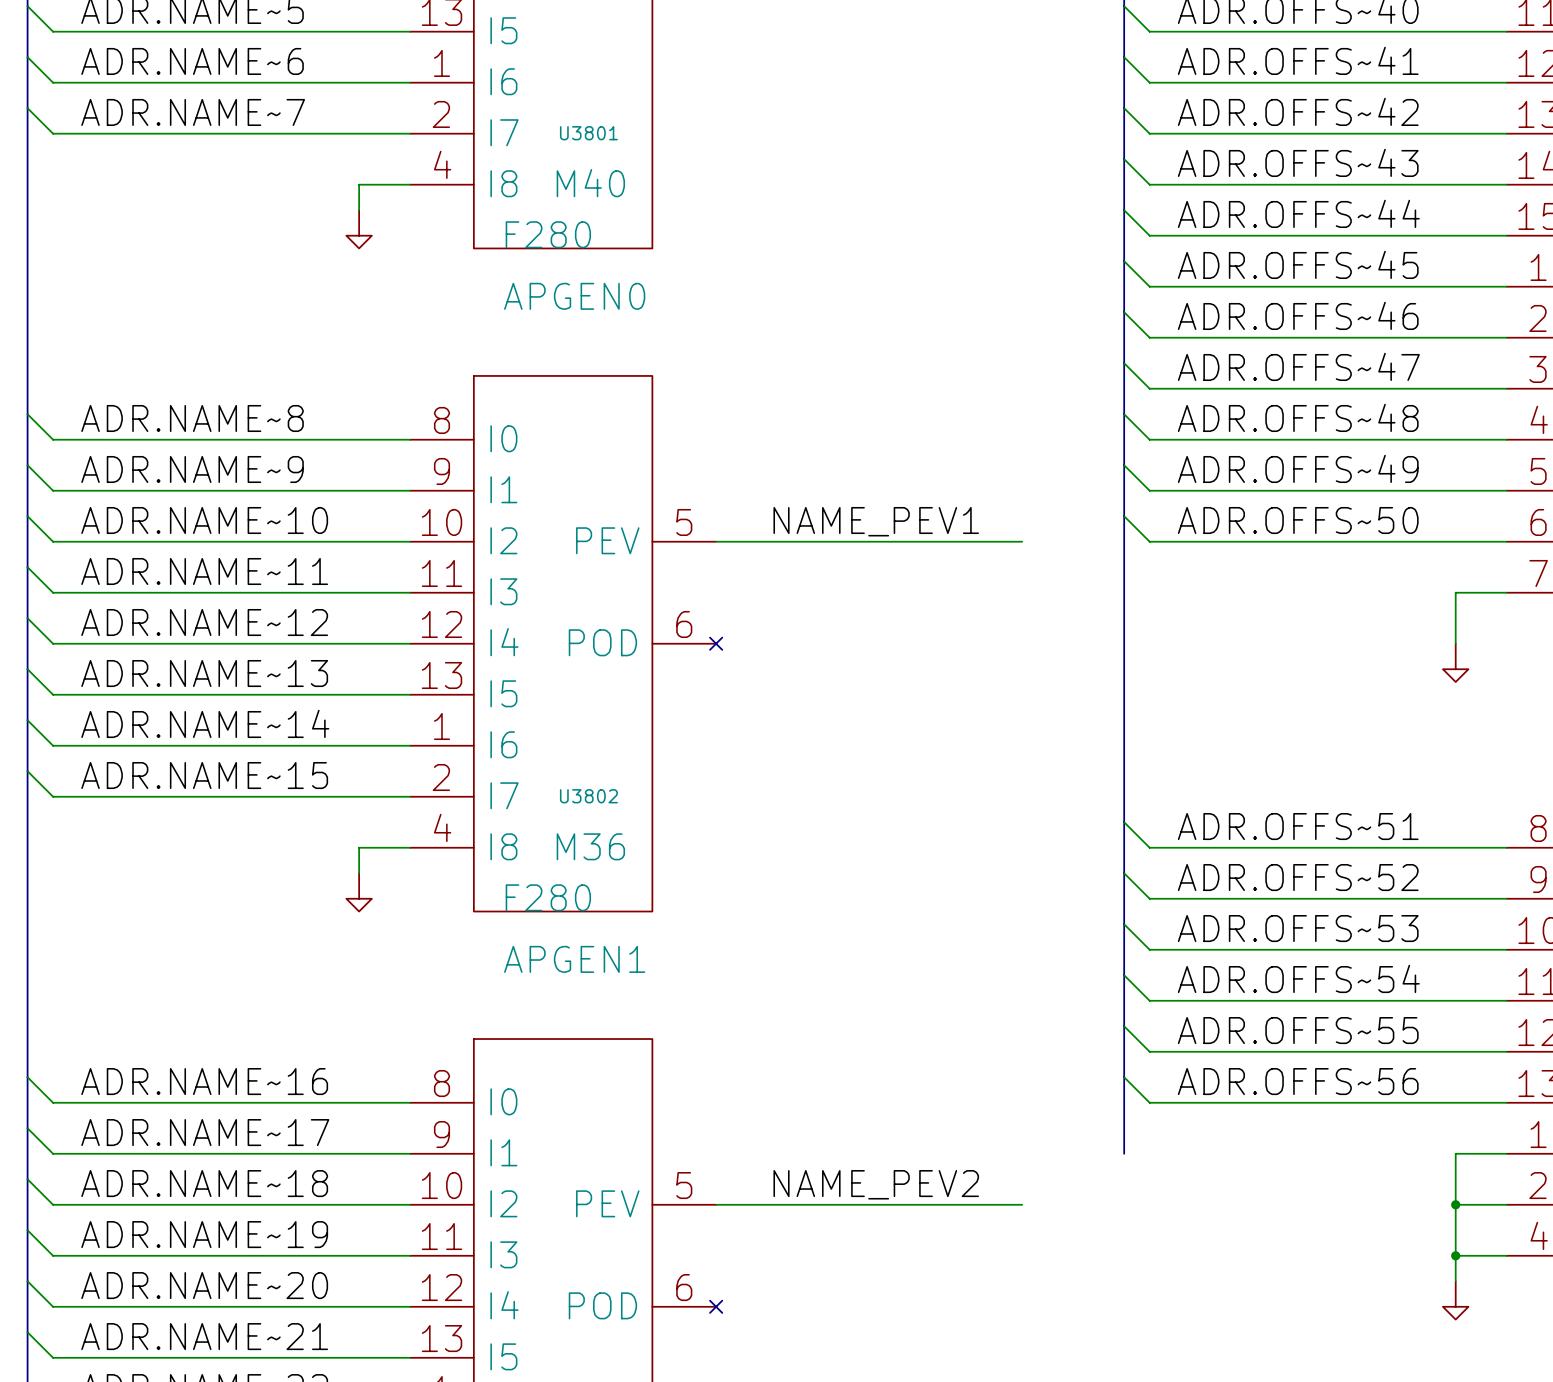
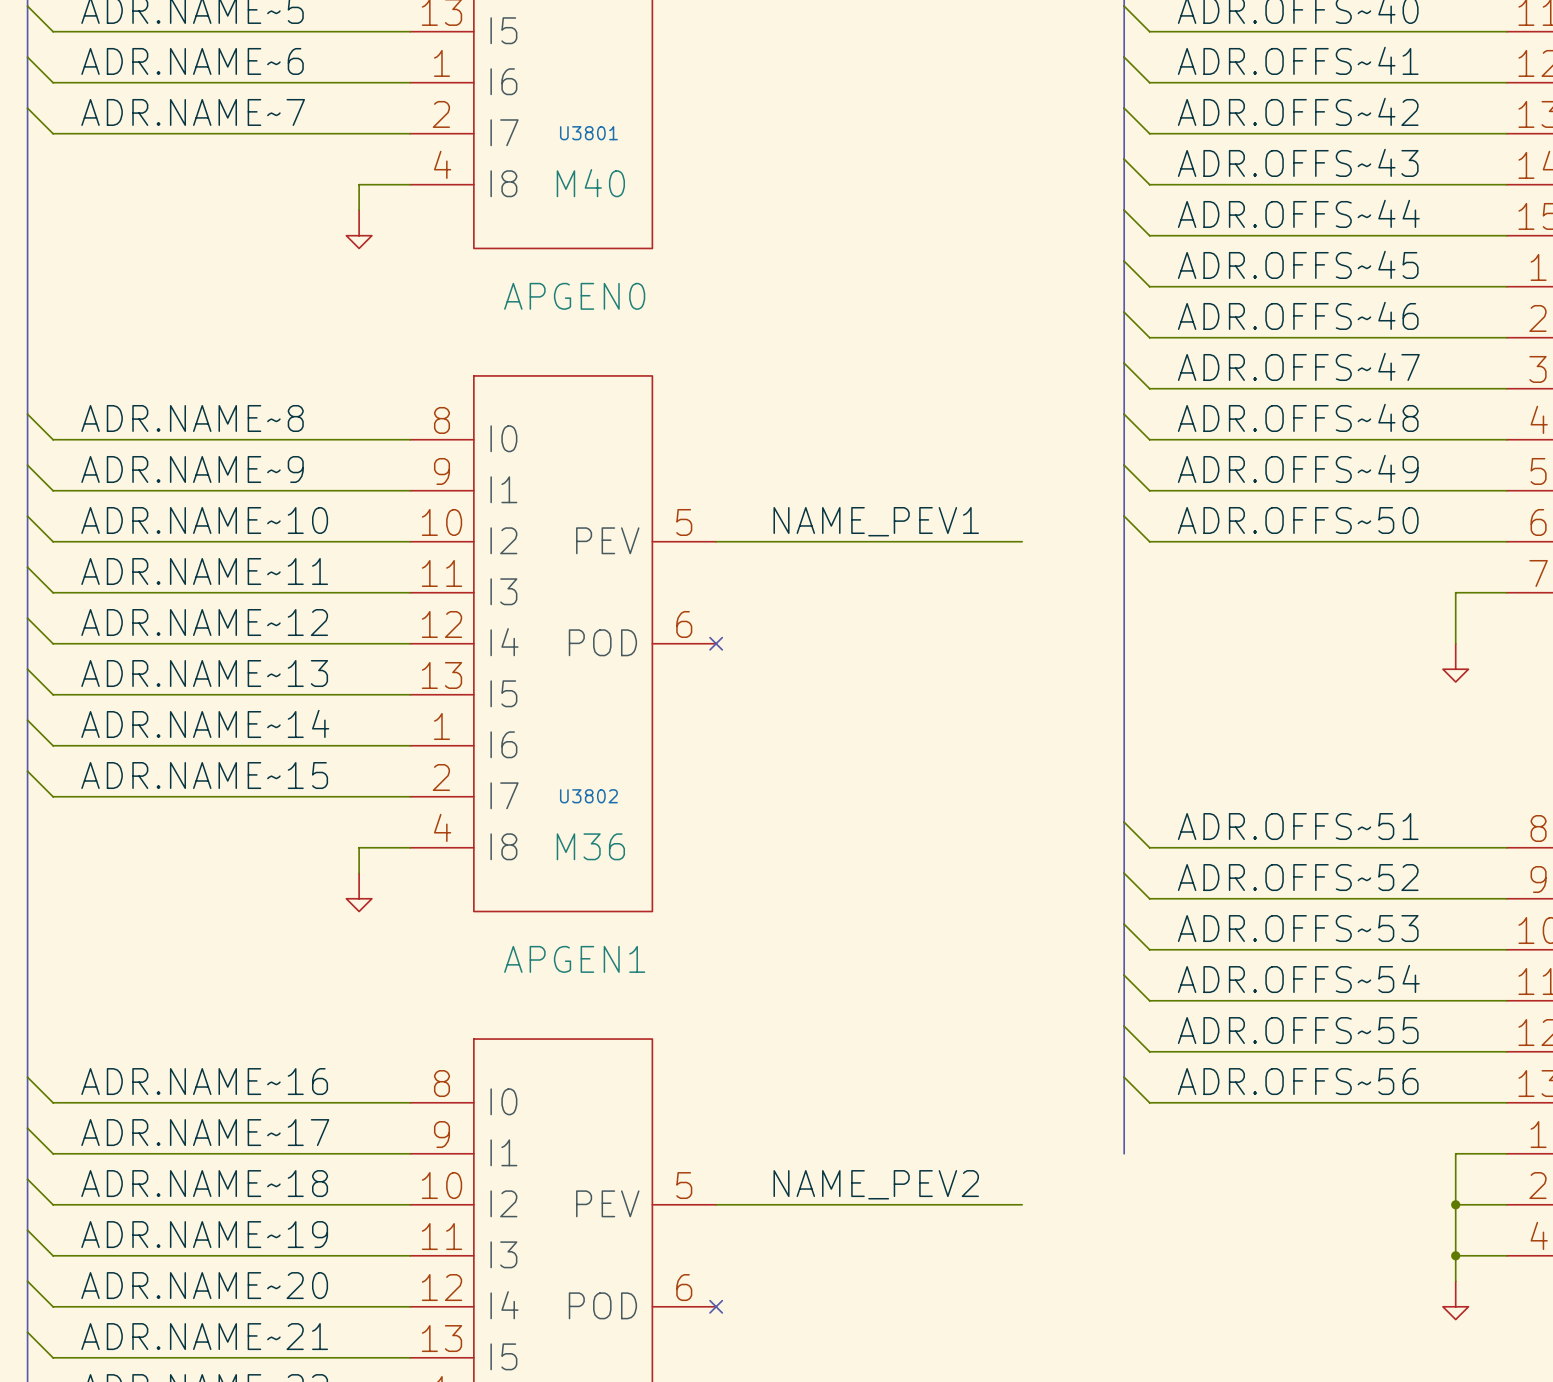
U3801 value: F280 (548, 234) -> none
U3802 value: F280 (548, 897) -> none

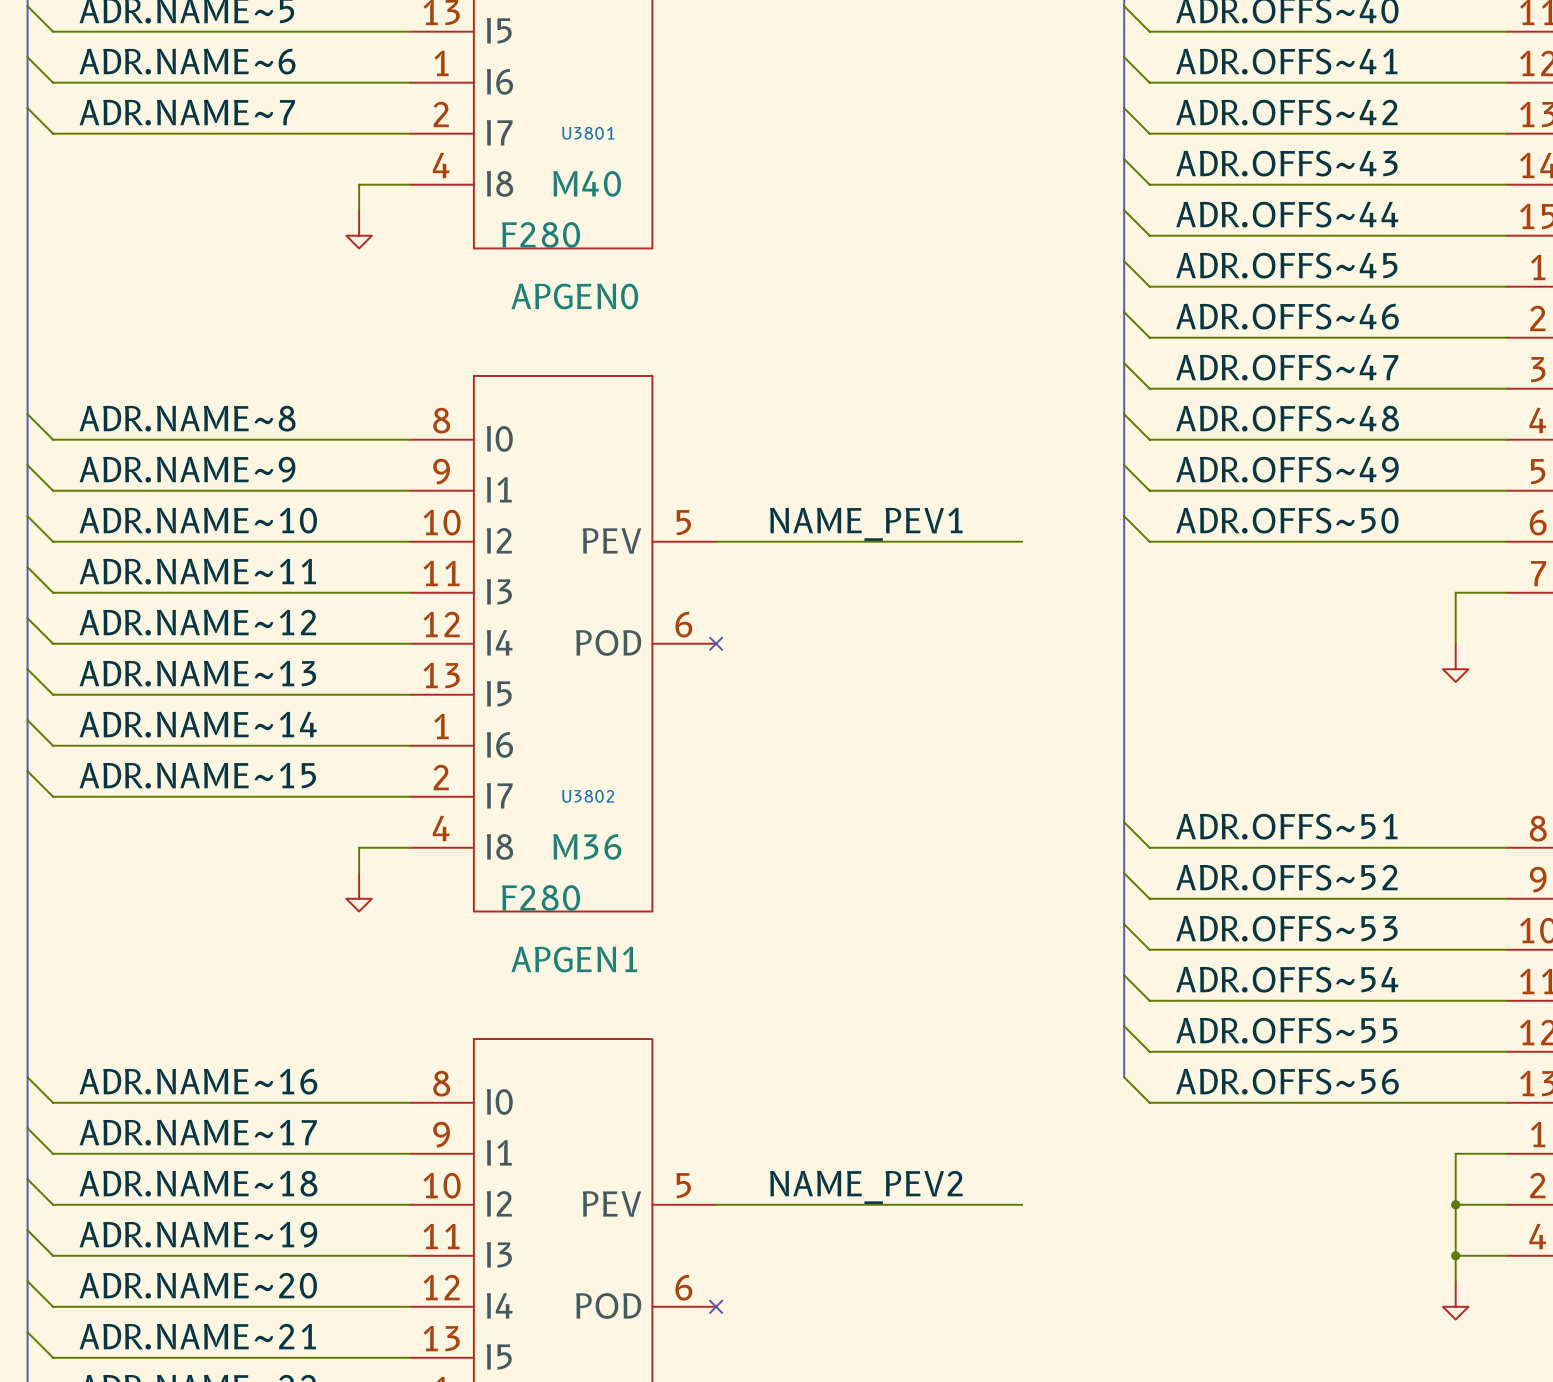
U3801 value: none -> F280 (541, 234)
U3802 value: none -> F280 (541, 897)
bus: (1124, 1077) (1124, 1153) -> none

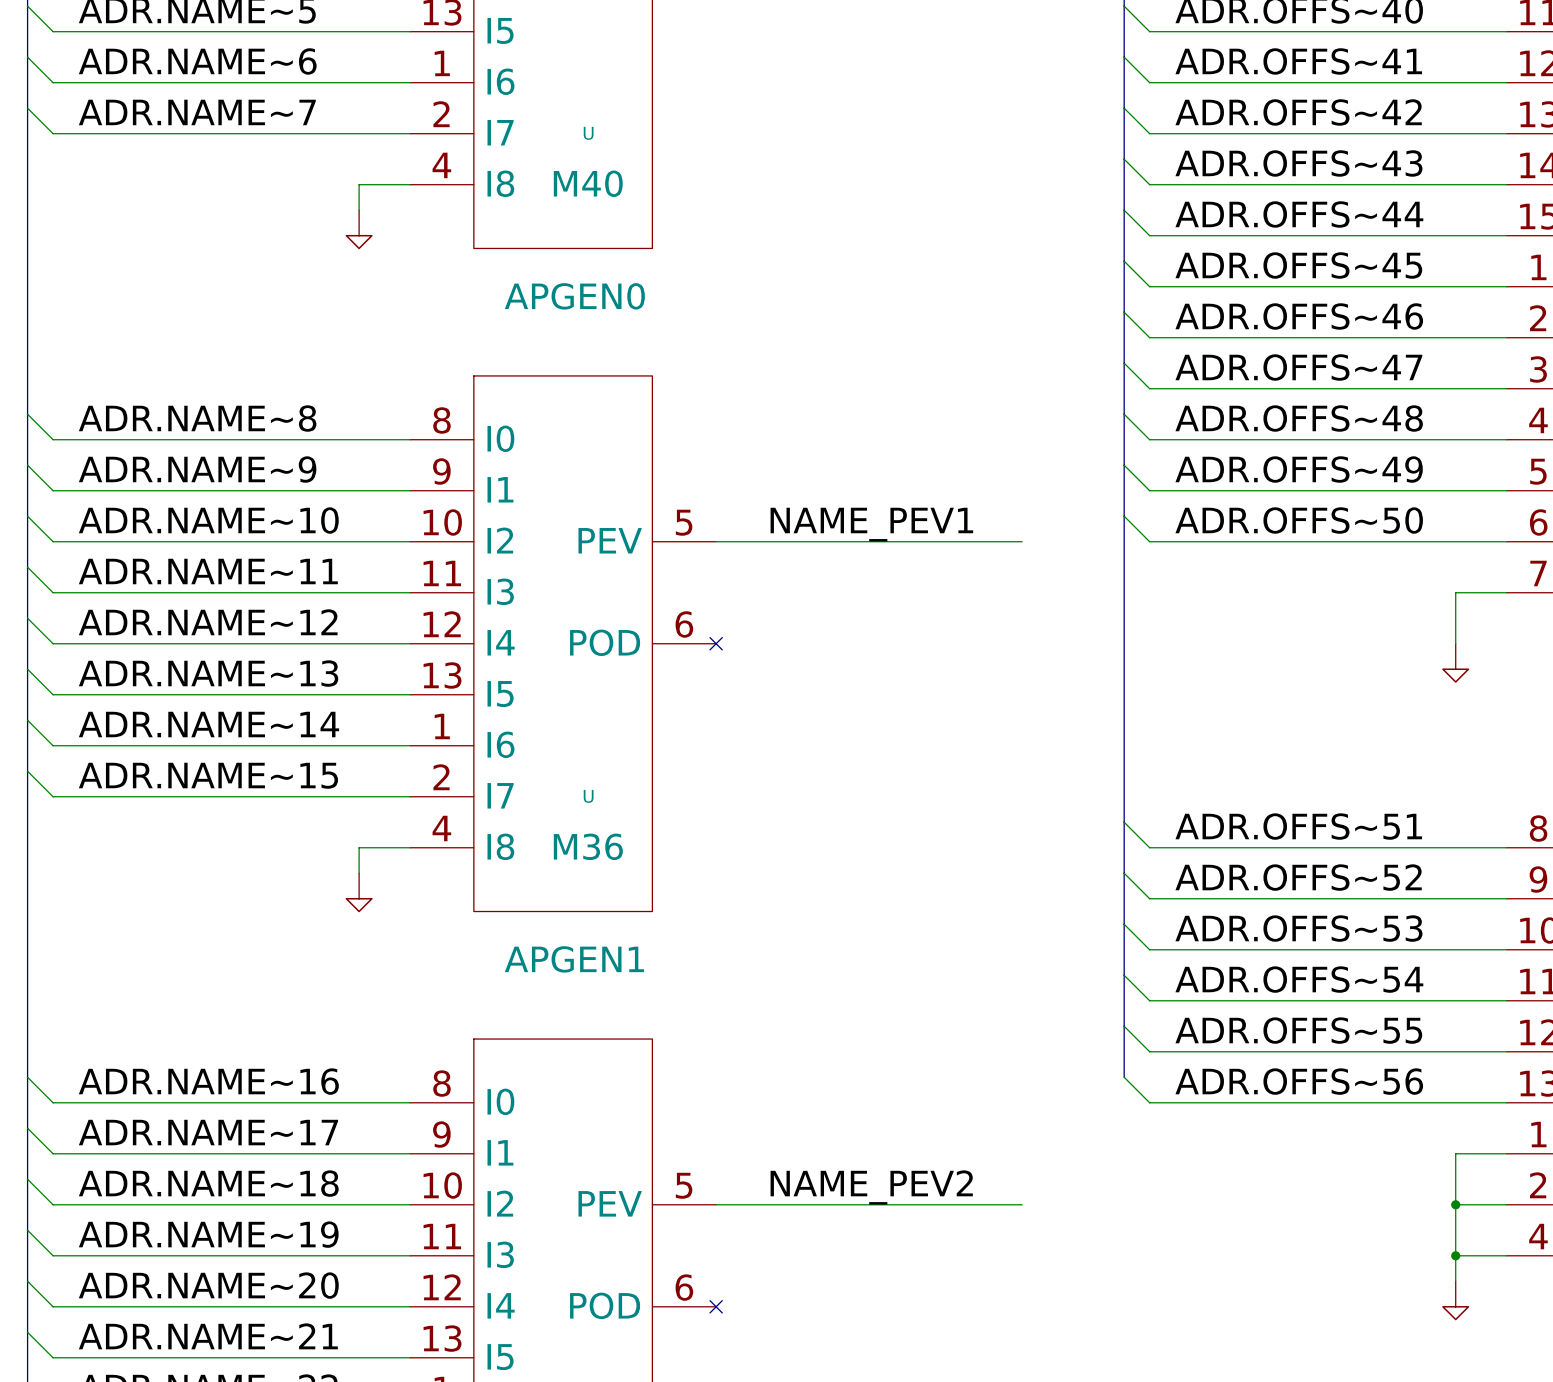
U3801 name: U3801 (588, 133) -> U (588, 133)
U3801 value: F280 (541, 234) -> none
U3802 name: U3802 (588, 796) -> U (588, 796)
U3802 value: F280 (541, 897) -> none

